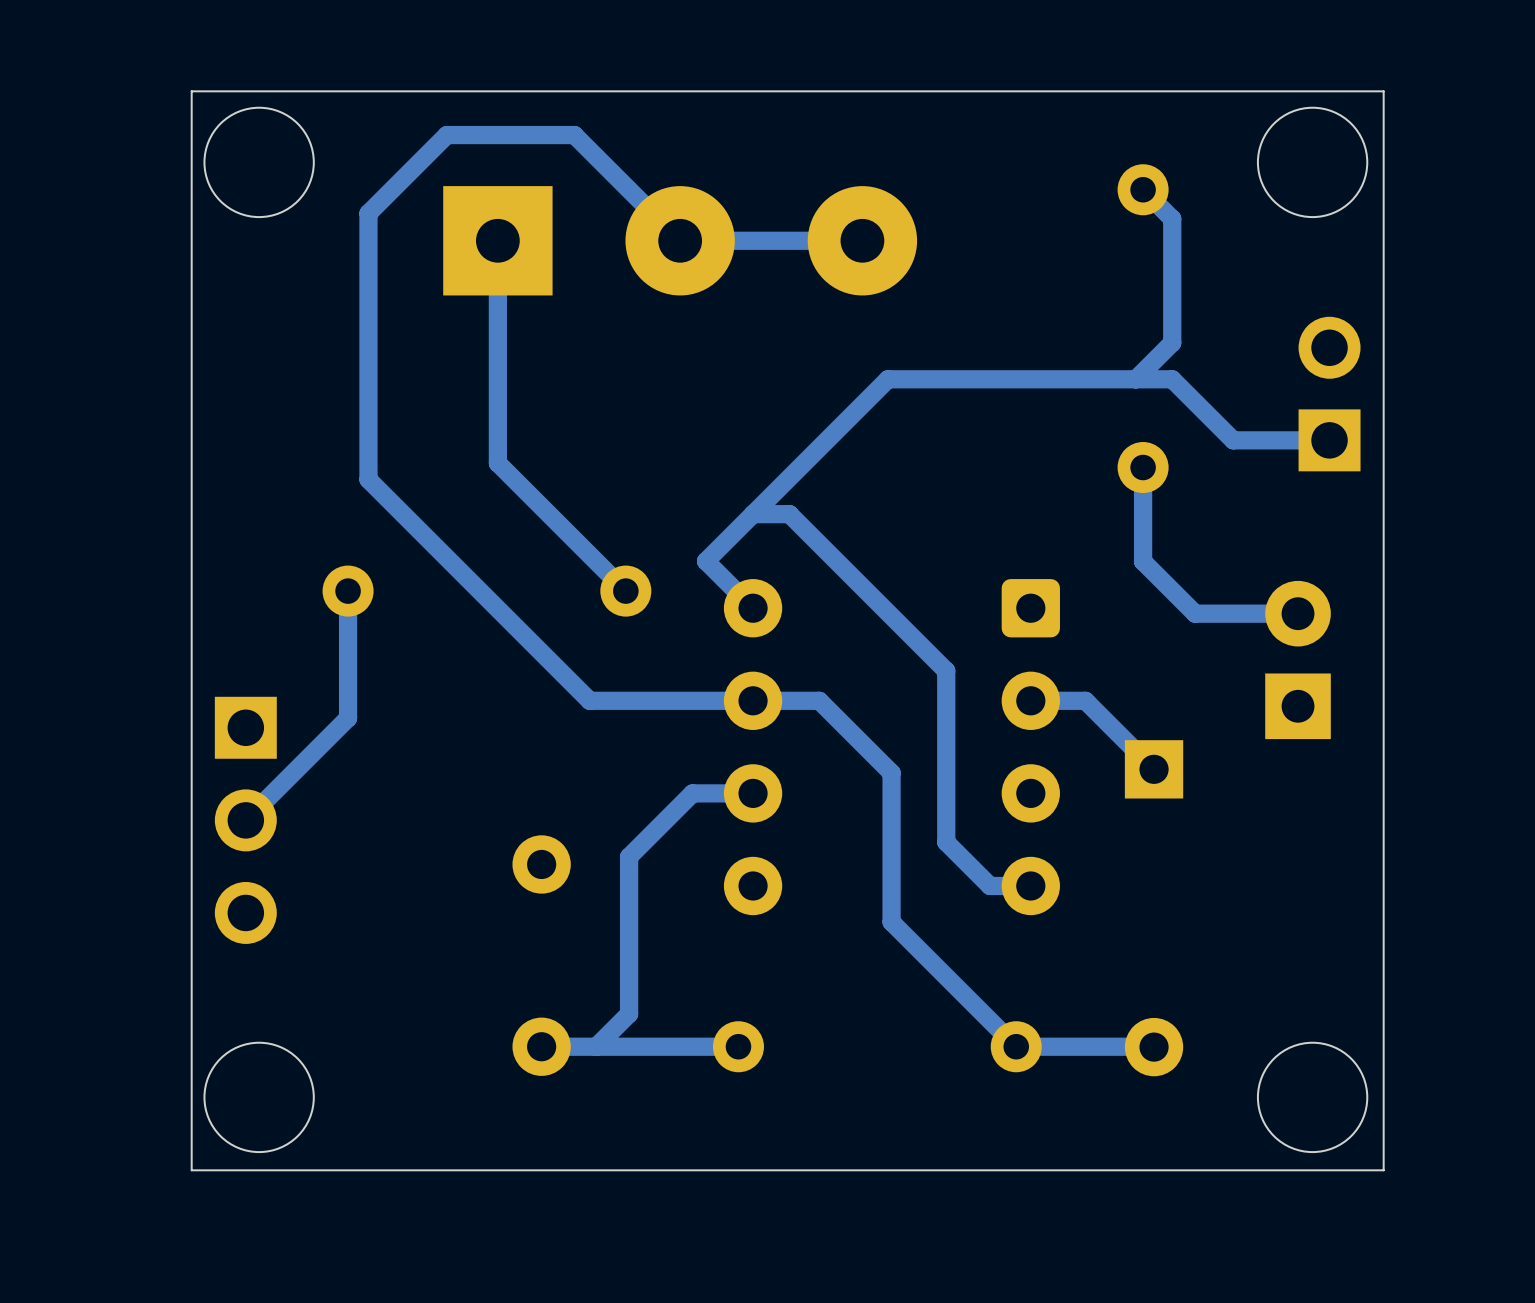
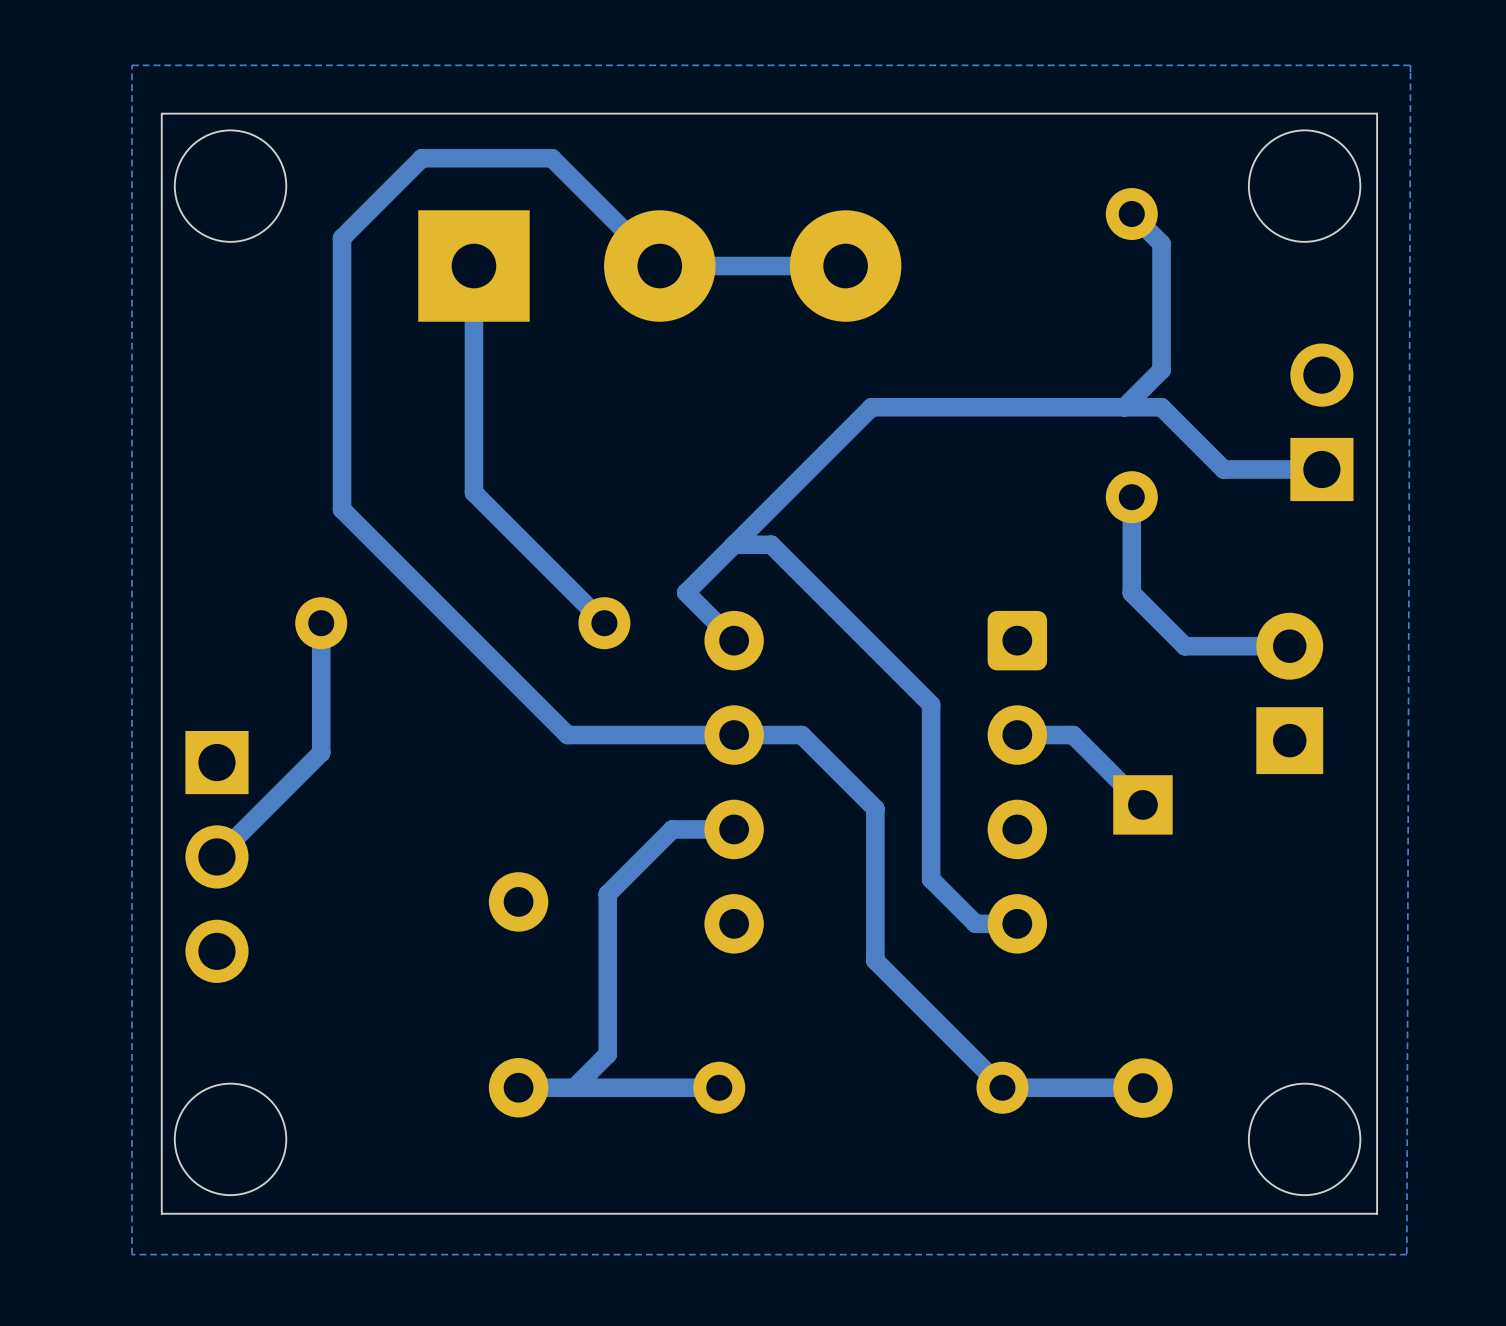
zone outline: none -> (1410, 65) (132, 65) (132, 1254) (1406, 1254) (1410, 65)

